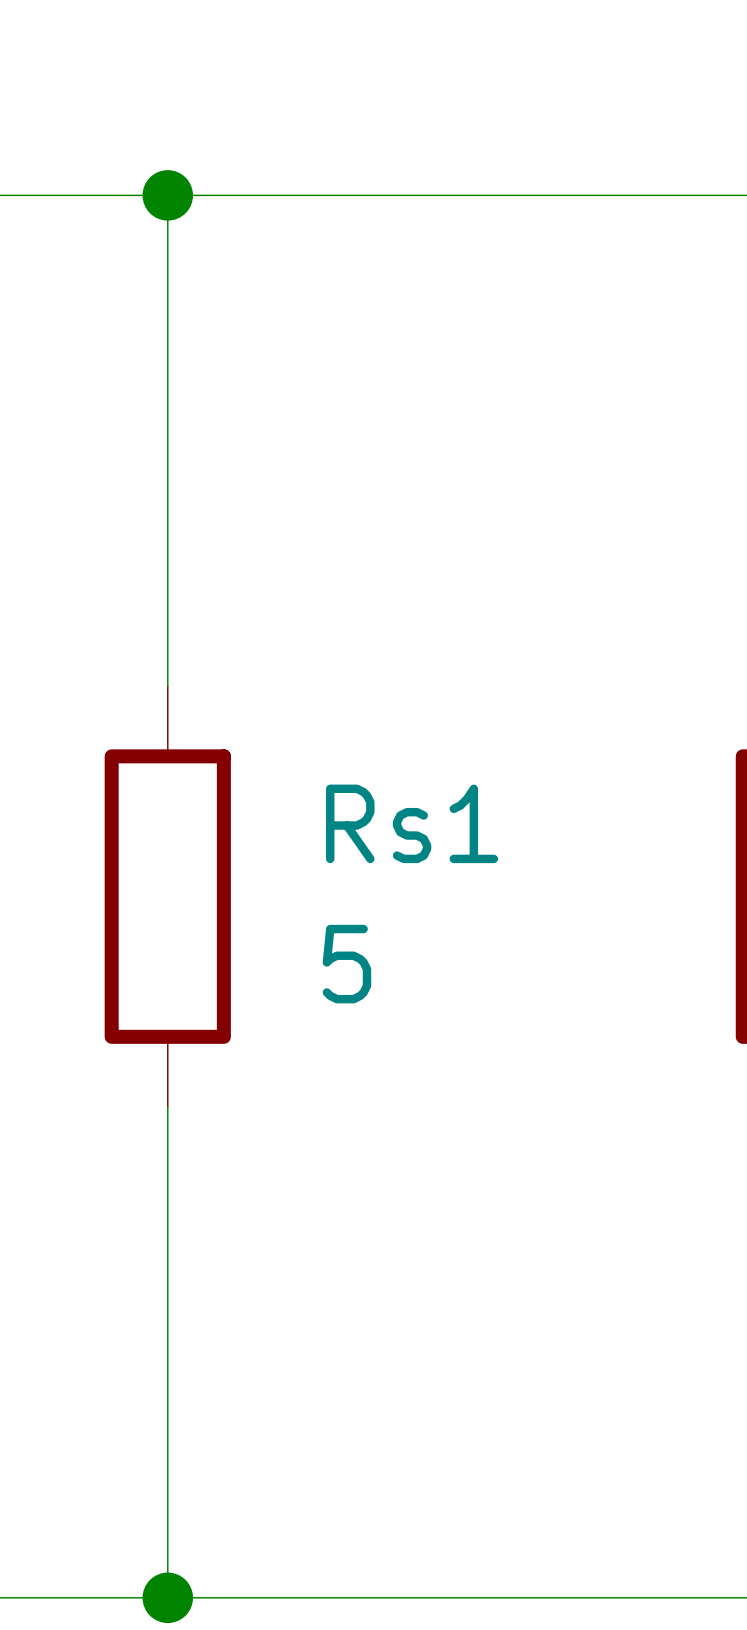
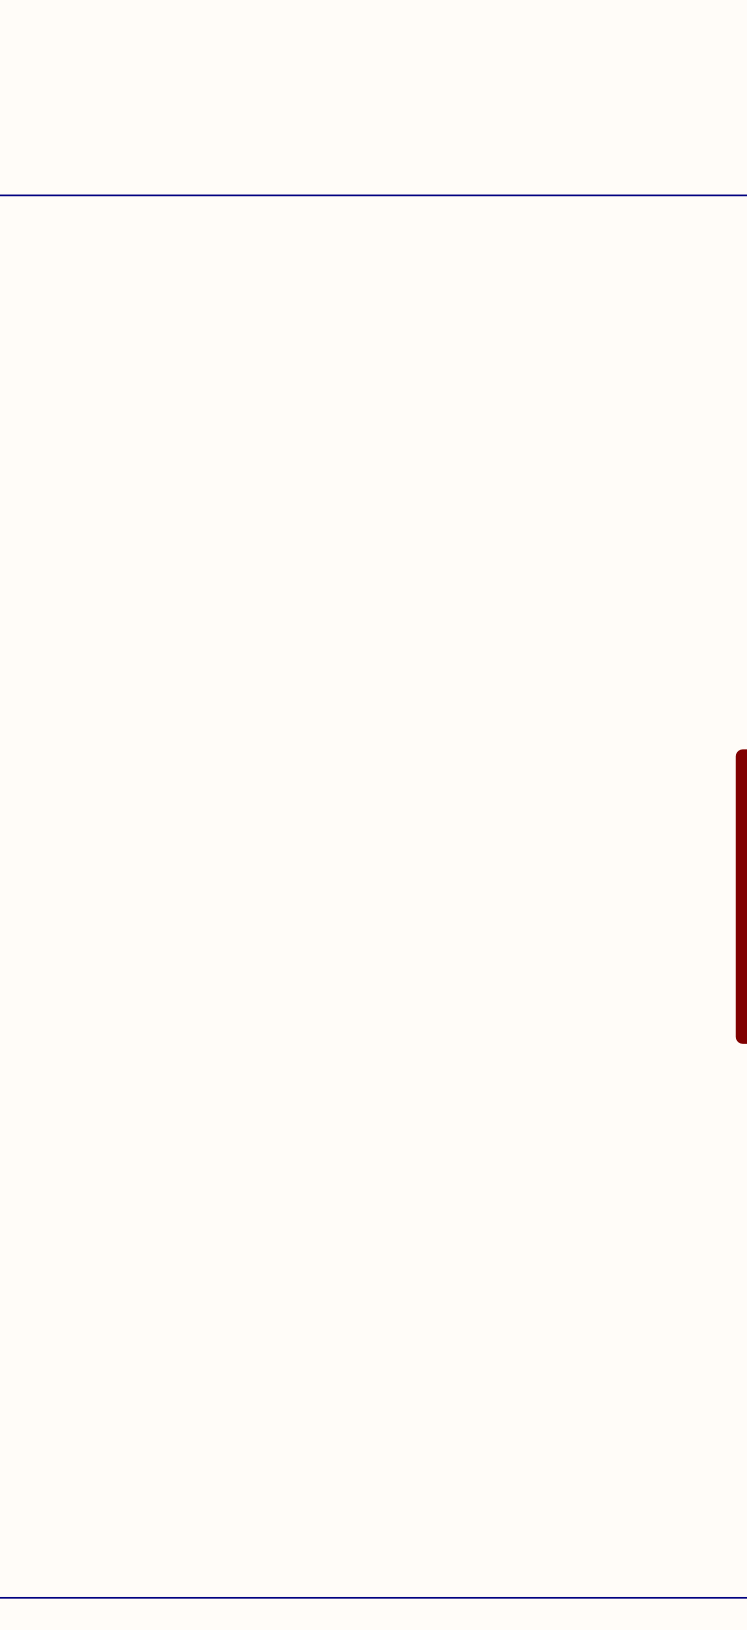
wire: (167, 195) (167, 686) -> none
junction: (167, 195) -> none
Rs1: 5 (167, 896) -> none
wire: (167, 1106) (167, 1597) -> none
junction: (167, 1597) -> none

